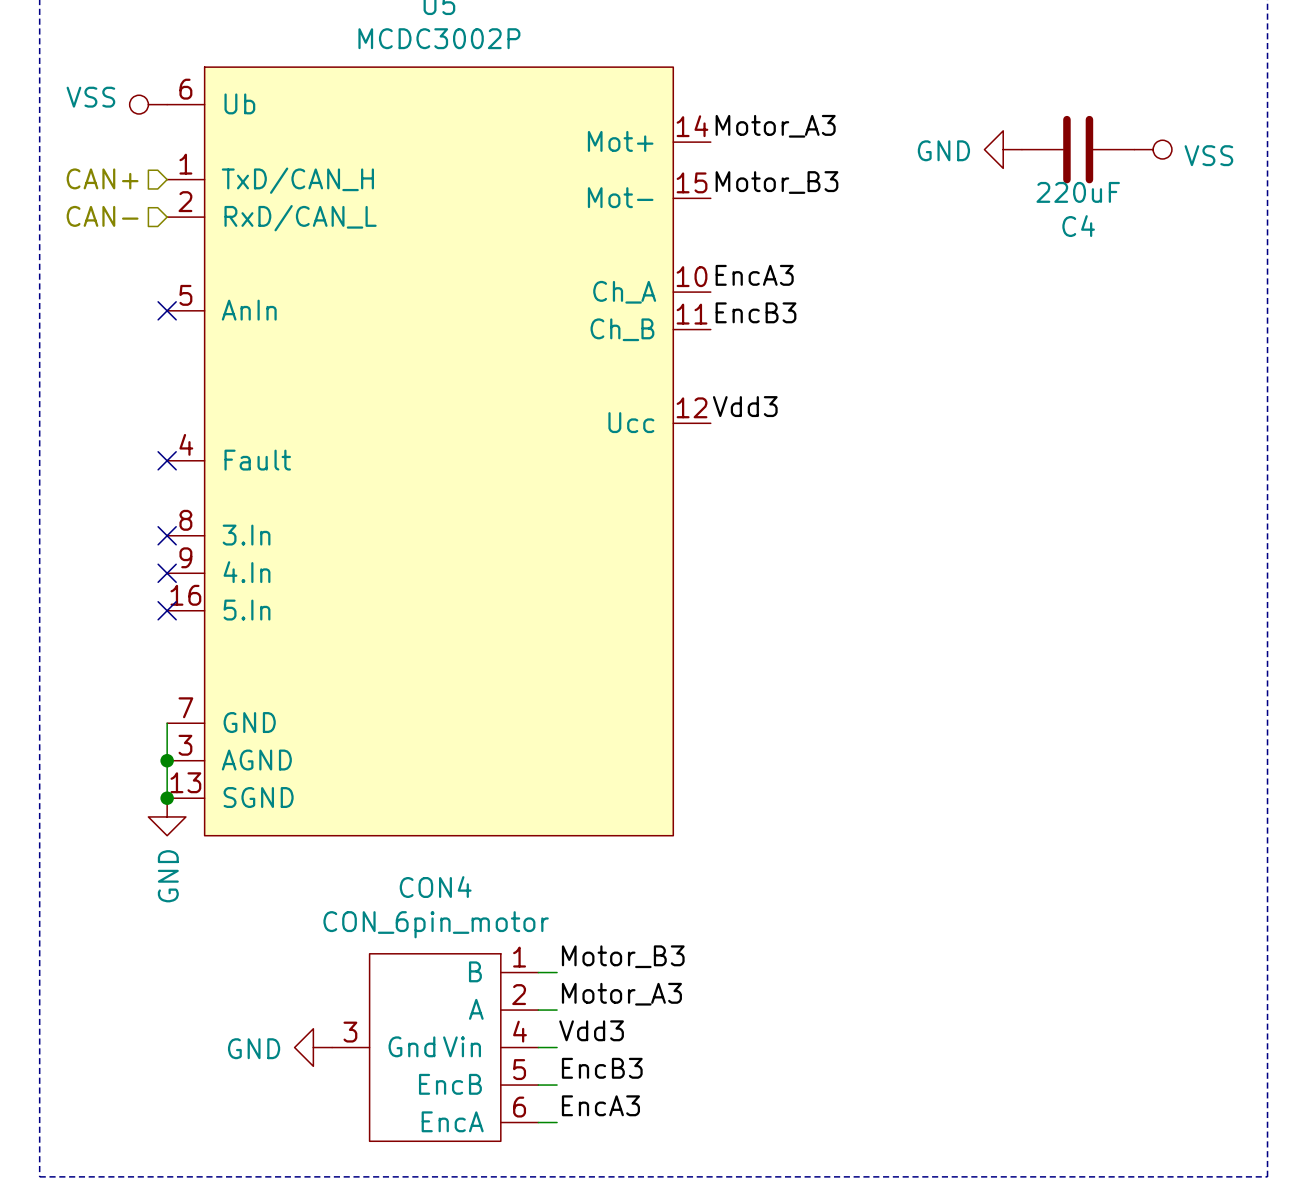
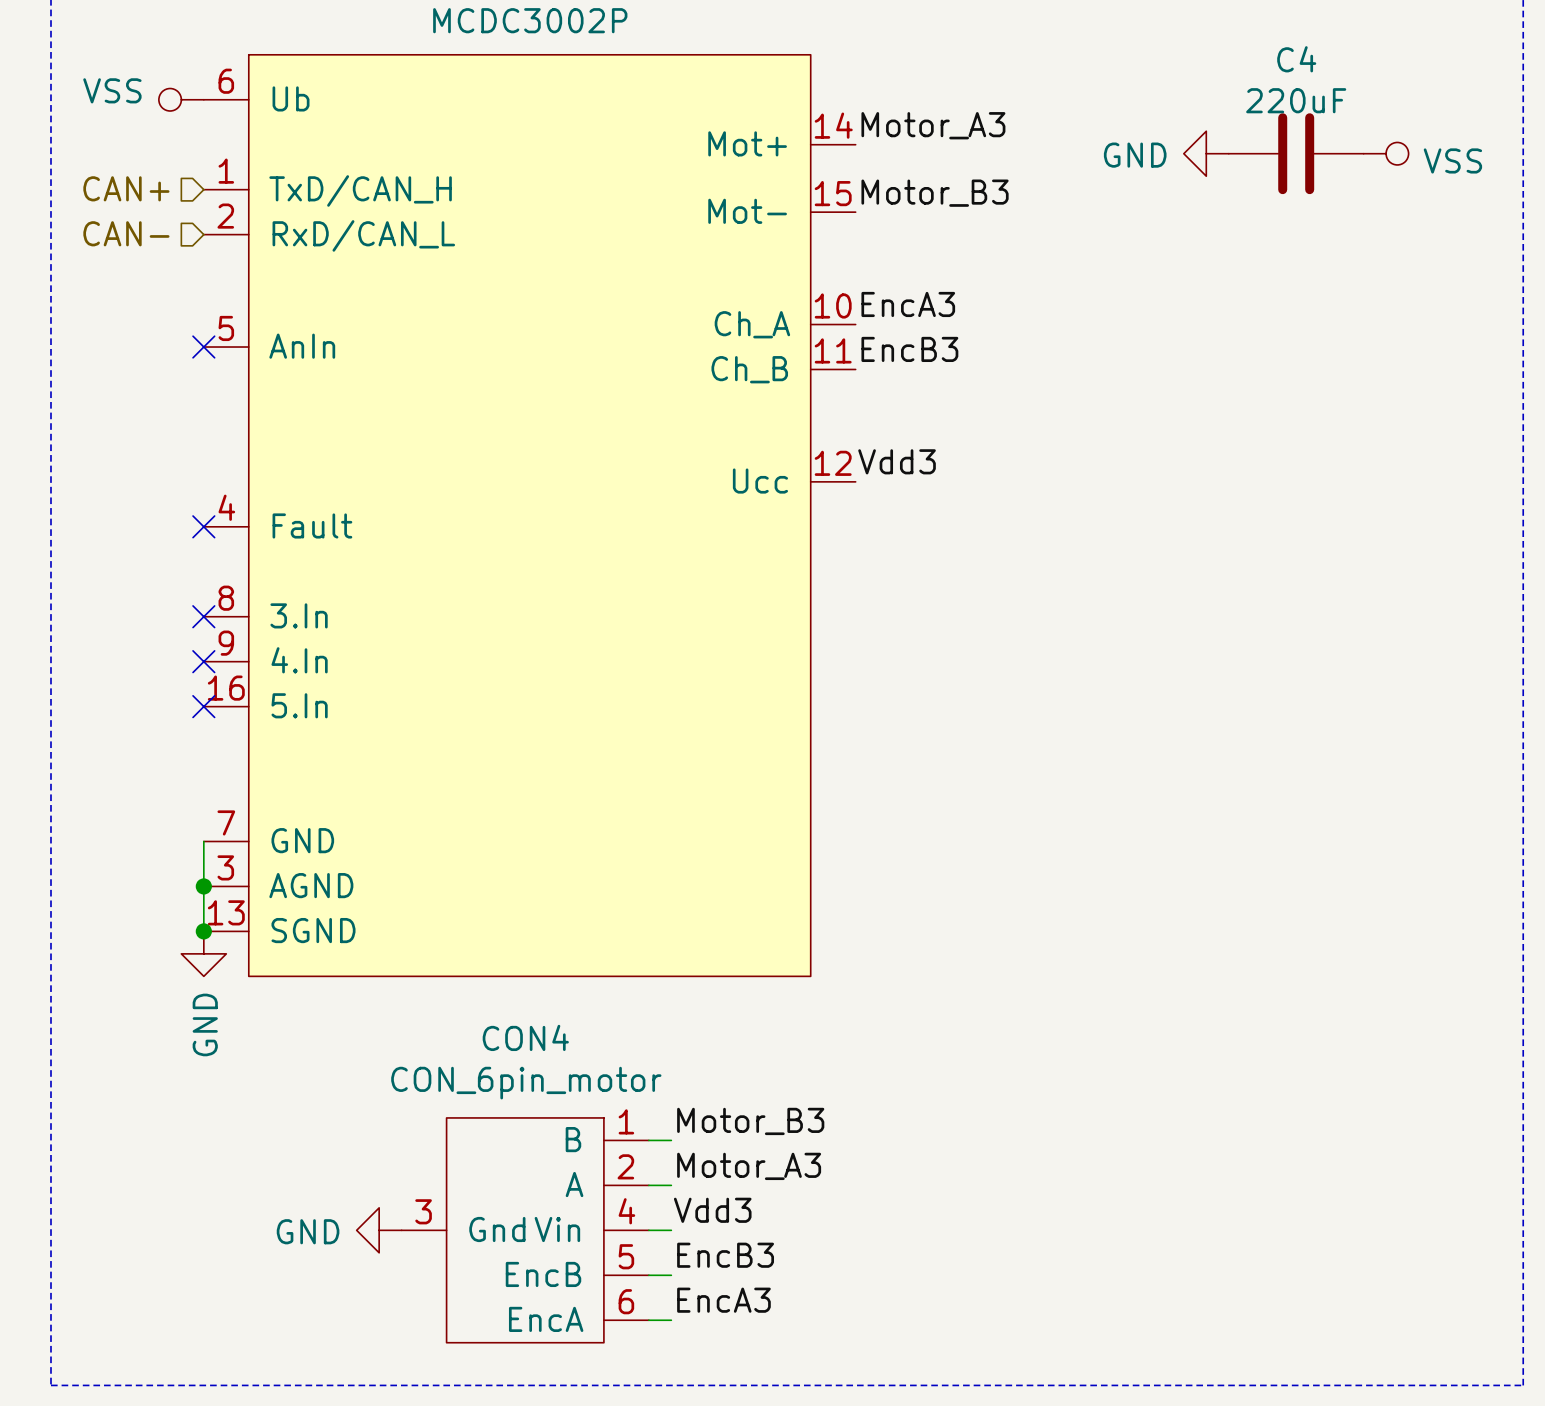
C4 value position: 220uF (1078, 192) -> 220uF (1296, 100)
C4 name position: C4 (1078, 226) -> C4 (1296, 59)

